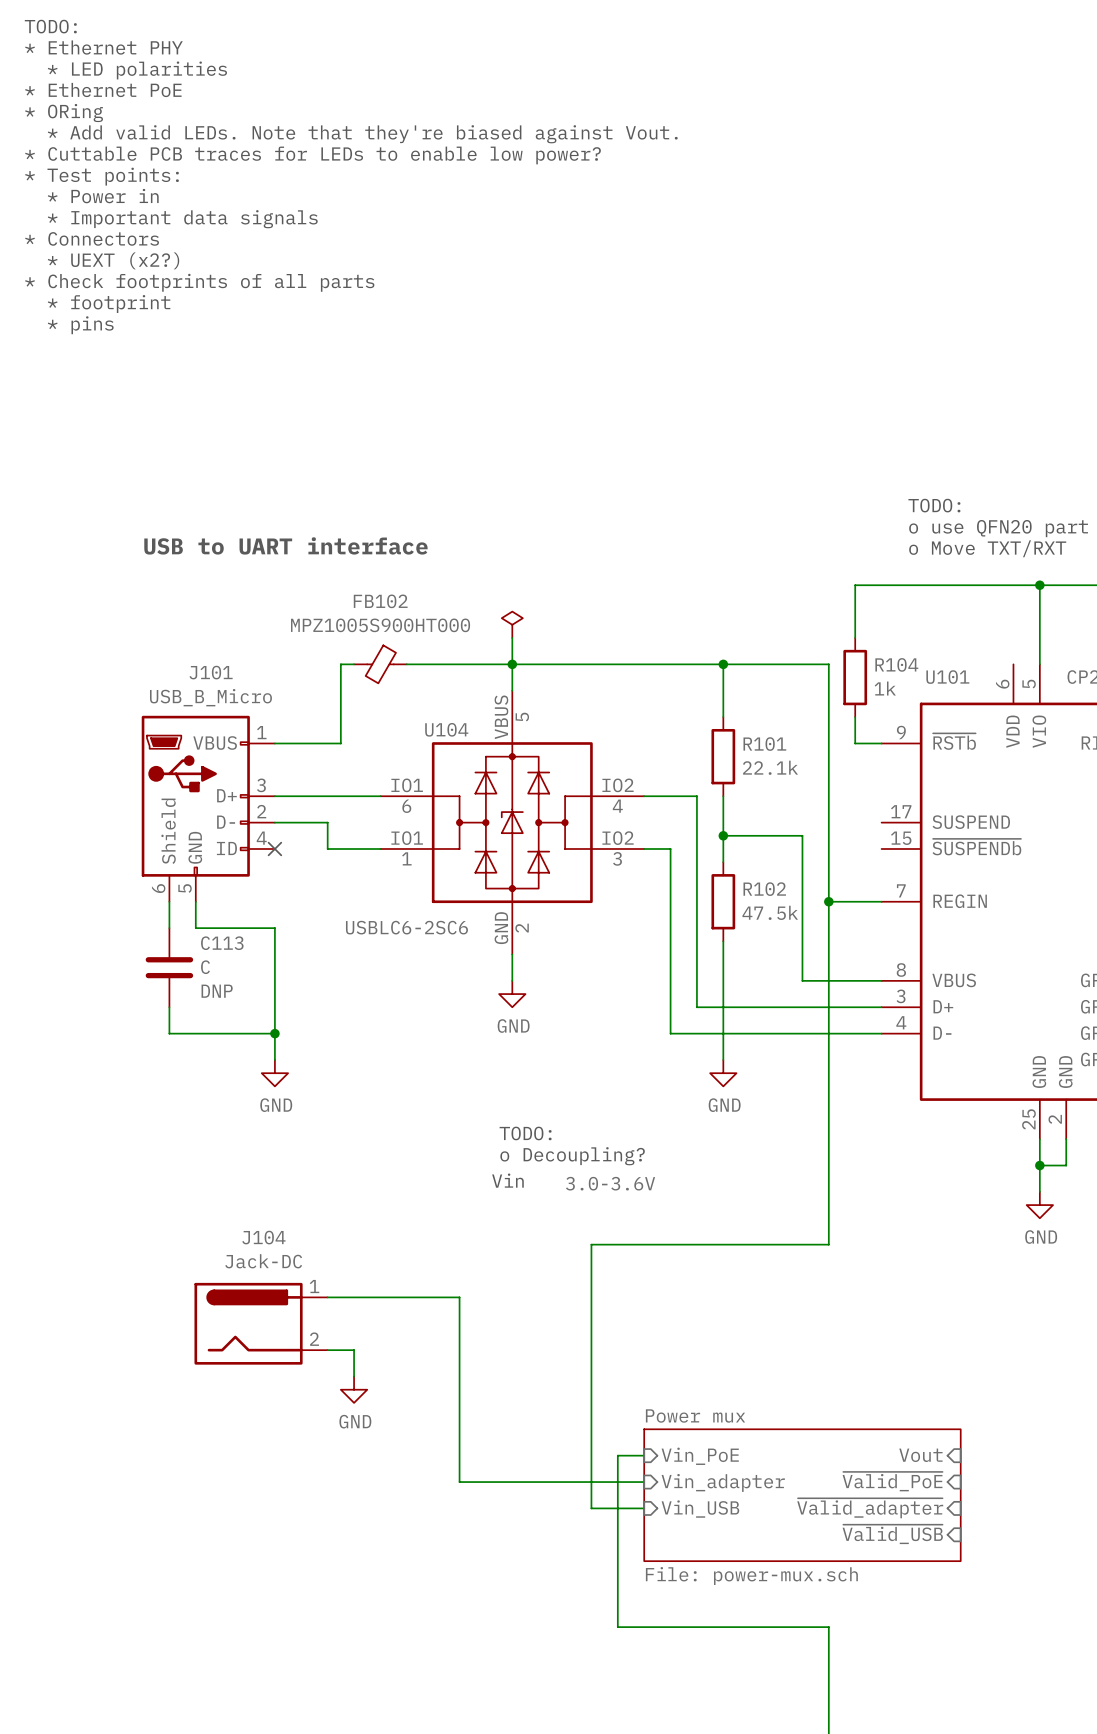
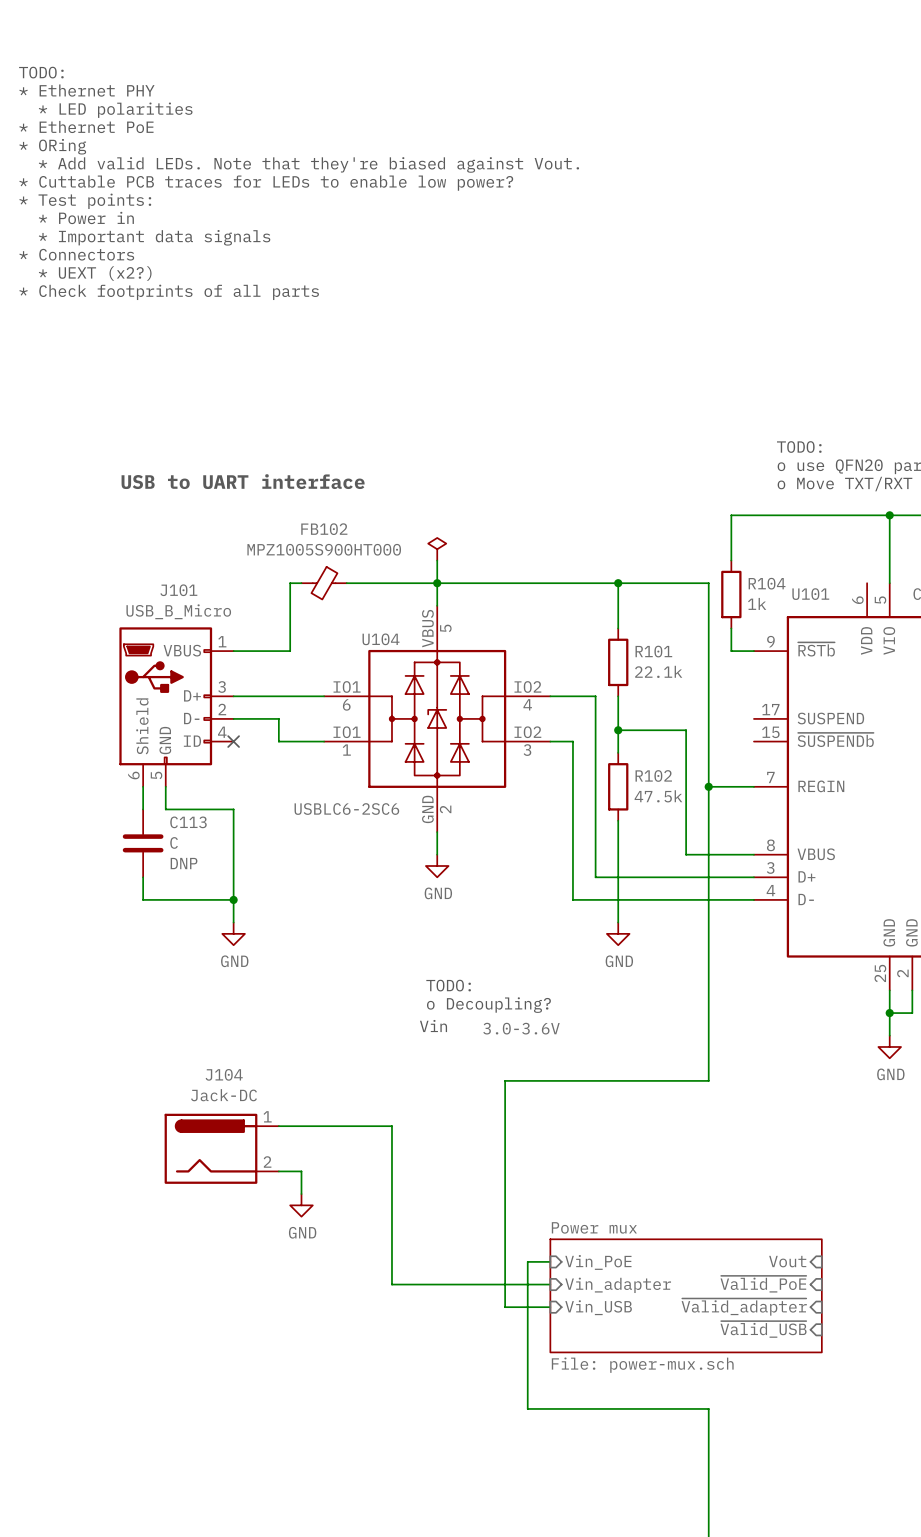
text: TODO: (50, 26) -> none
text: * Ethernet PHY (103, 47) -> none
text: * LED polarities (137, 70) -> TODO: (41, 72)
text: * Ethernet PoE (103, 90) -> * Ethernet PHY (86, 90)
text: * ORing (64, 113) -> * LED polarities (115, 110)
text: * Add valid LEDs. Note that they're biased against Vout. (362, 134) -> * Ethernet PoE (86, 126)
text: * Cuttable PCB traces for LEDs to enable low power? (313, 155) -> * ORing (52, 146)
text: * Test points: (101, 176) -> * Add valid LEDs. Note that they're biased against Vout. (308, 164)
text: * Power in (103, 196) -> * Cuttable PCB traces for LEDs to enable low power? (266, 183)
text: * Important data signals (182, 219) -> * Test points: (85, 201)
text: * Connectors (92, 238) -> * Power in (86, 217)
text: * UEXT (x2?) (113, 260) -> * Important data signals (154, 237)
text: * Check footprints of all parts (199, 282) -> * Connectors (76, 254)
text: * footprint (109, 304) -> * UEXT (x2?) (95, 273)
text: * pins (80, 325) -> * Check footprints of all parts (169, 292)

